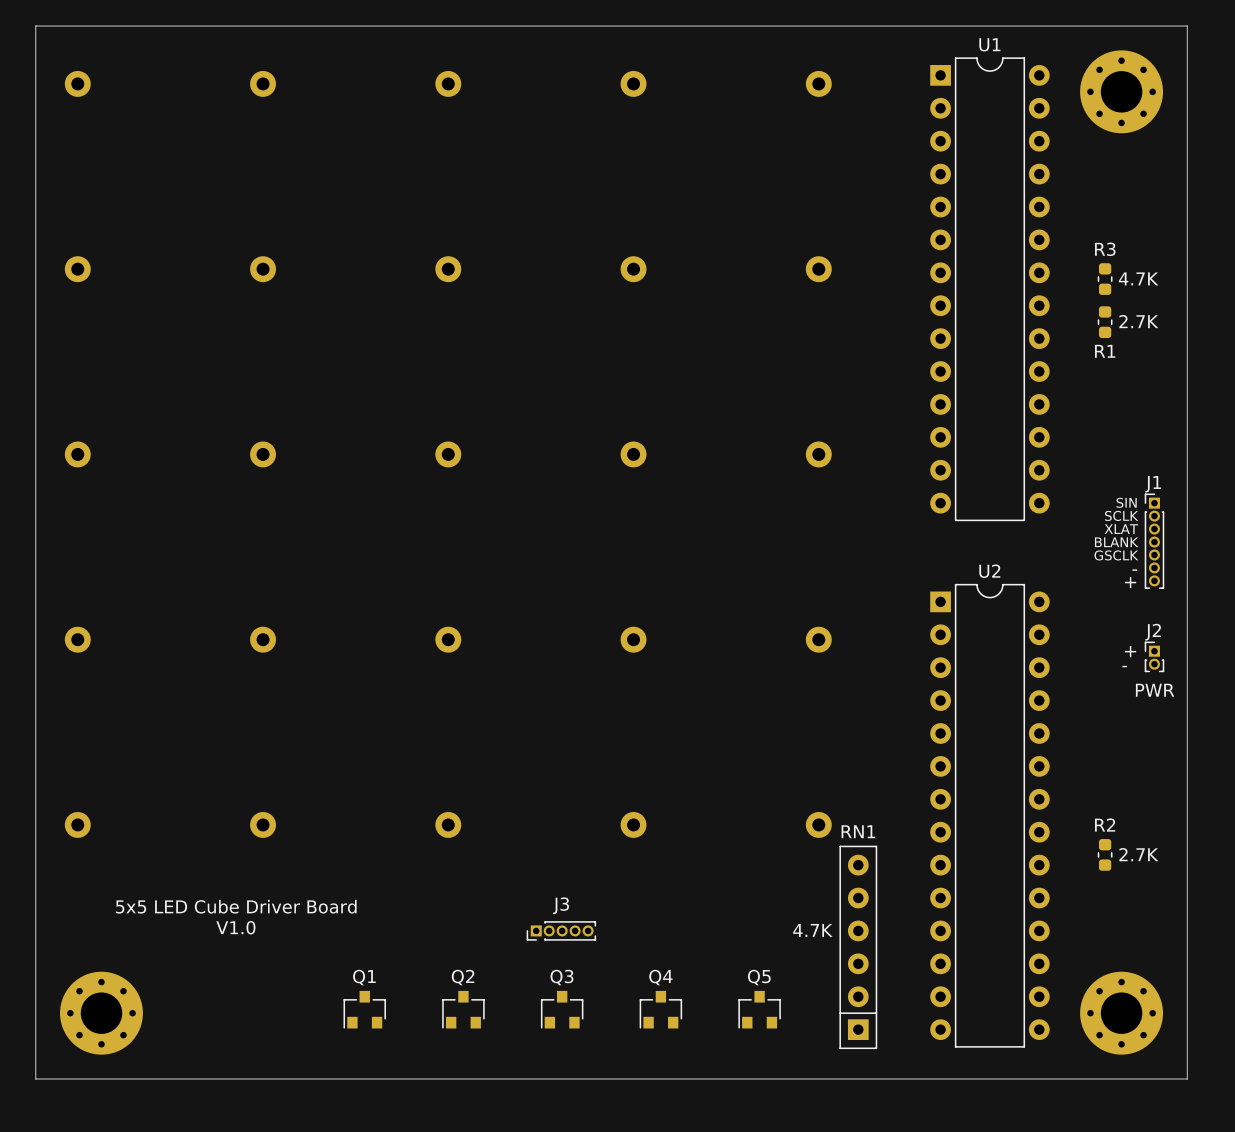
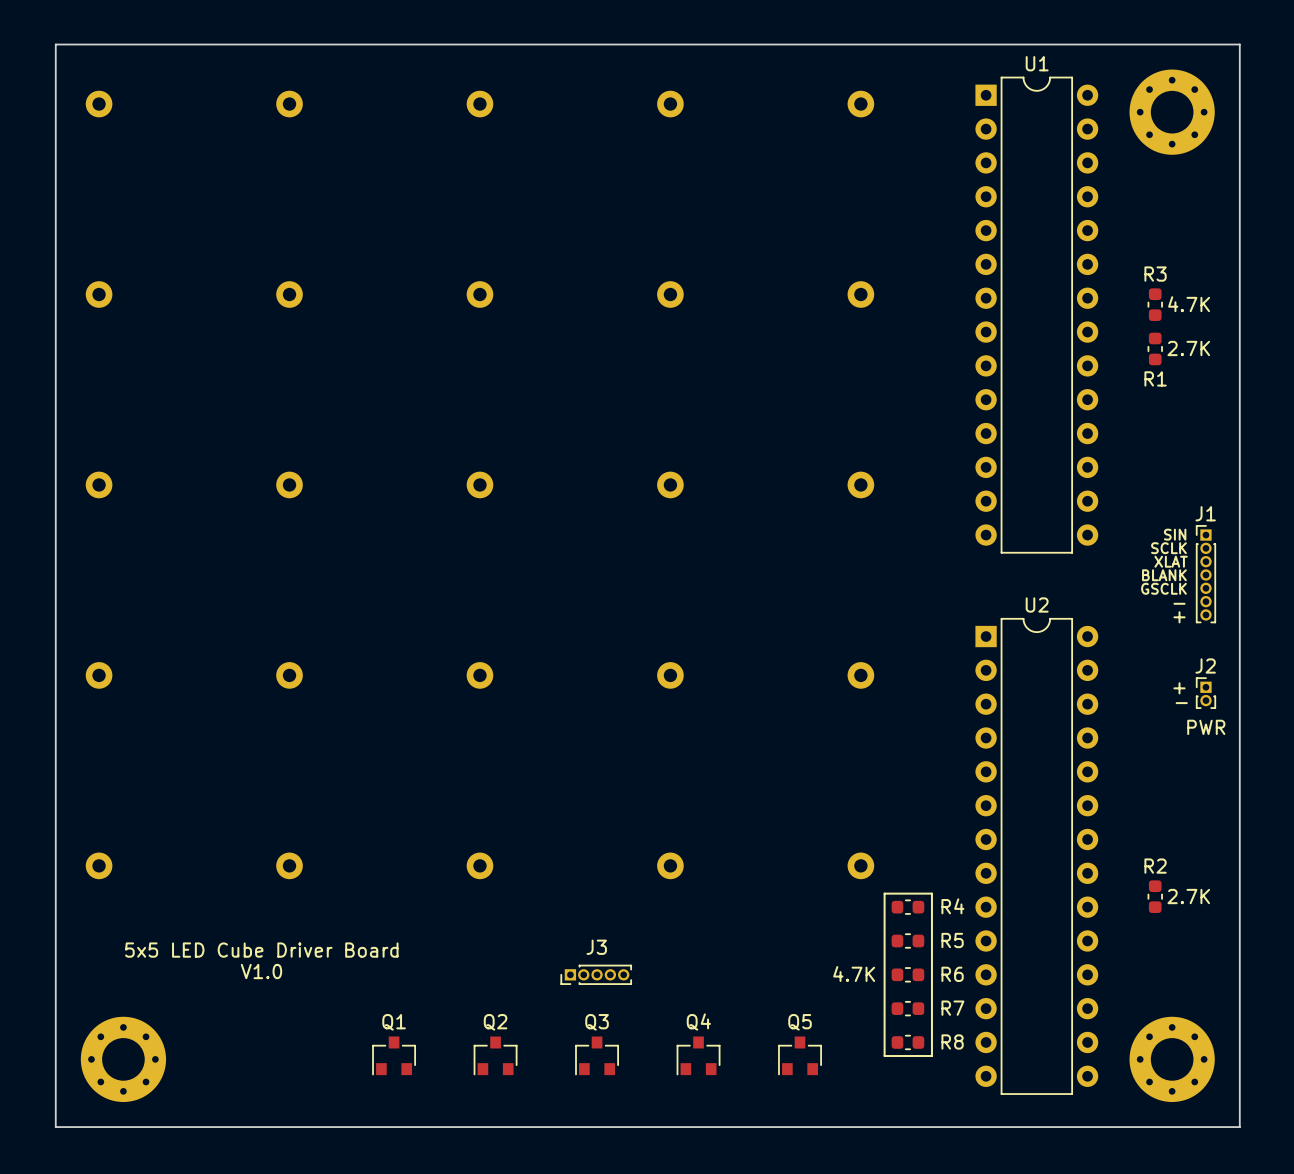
line: none -> (884, 893) (931, 893) (931, 1056) (884, 1056) (884, 893)
R4: none -> (907, 907)
R5: none -> (907, 940)
R6: none -> (907, 974)
RN1: (858, 947) -> none
R7: none -> (907, 1008)
R8: none -> (907, 1042)

